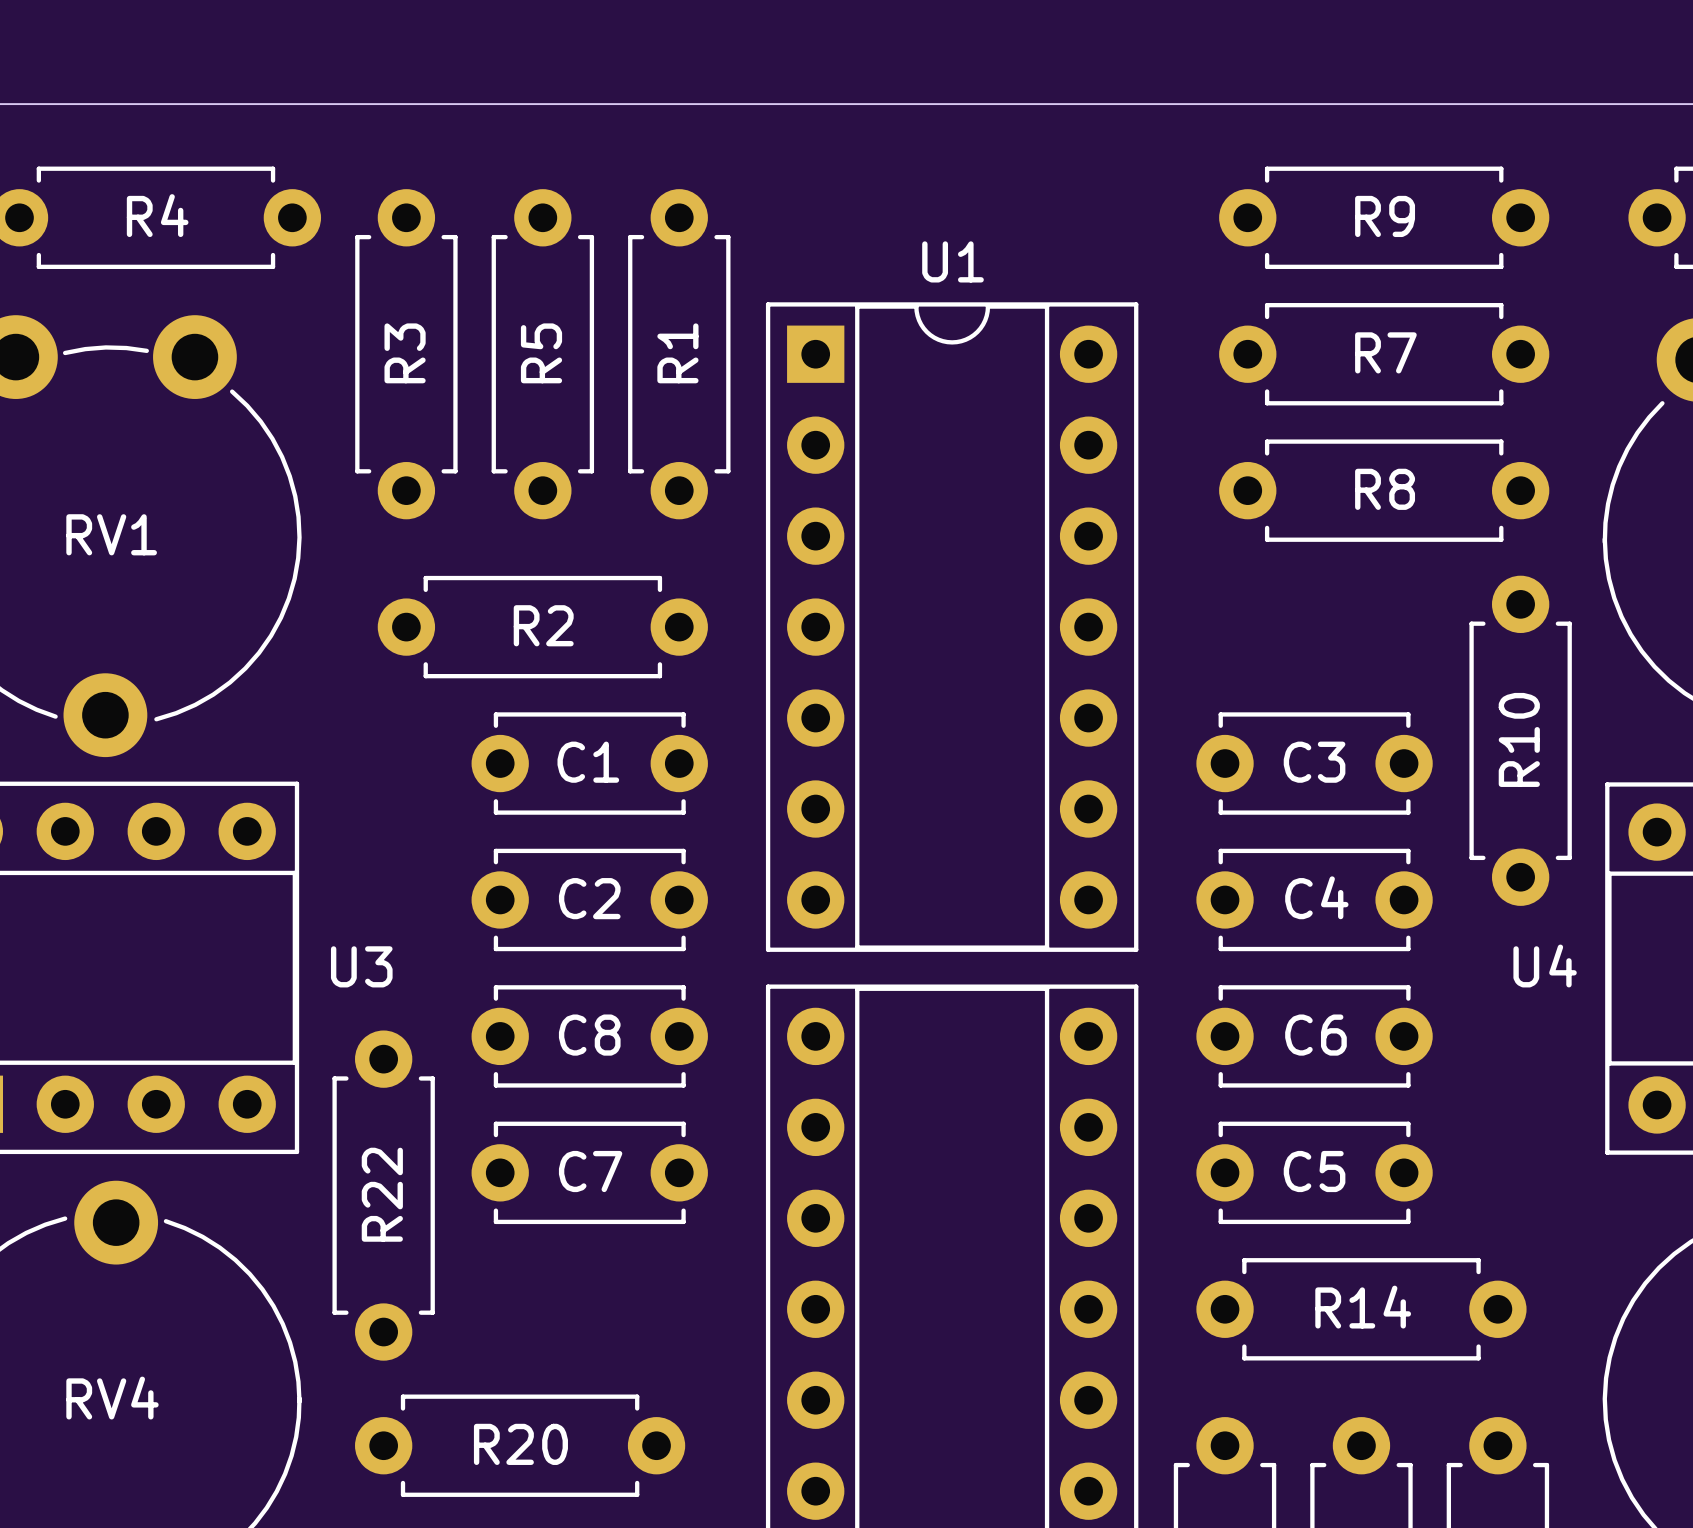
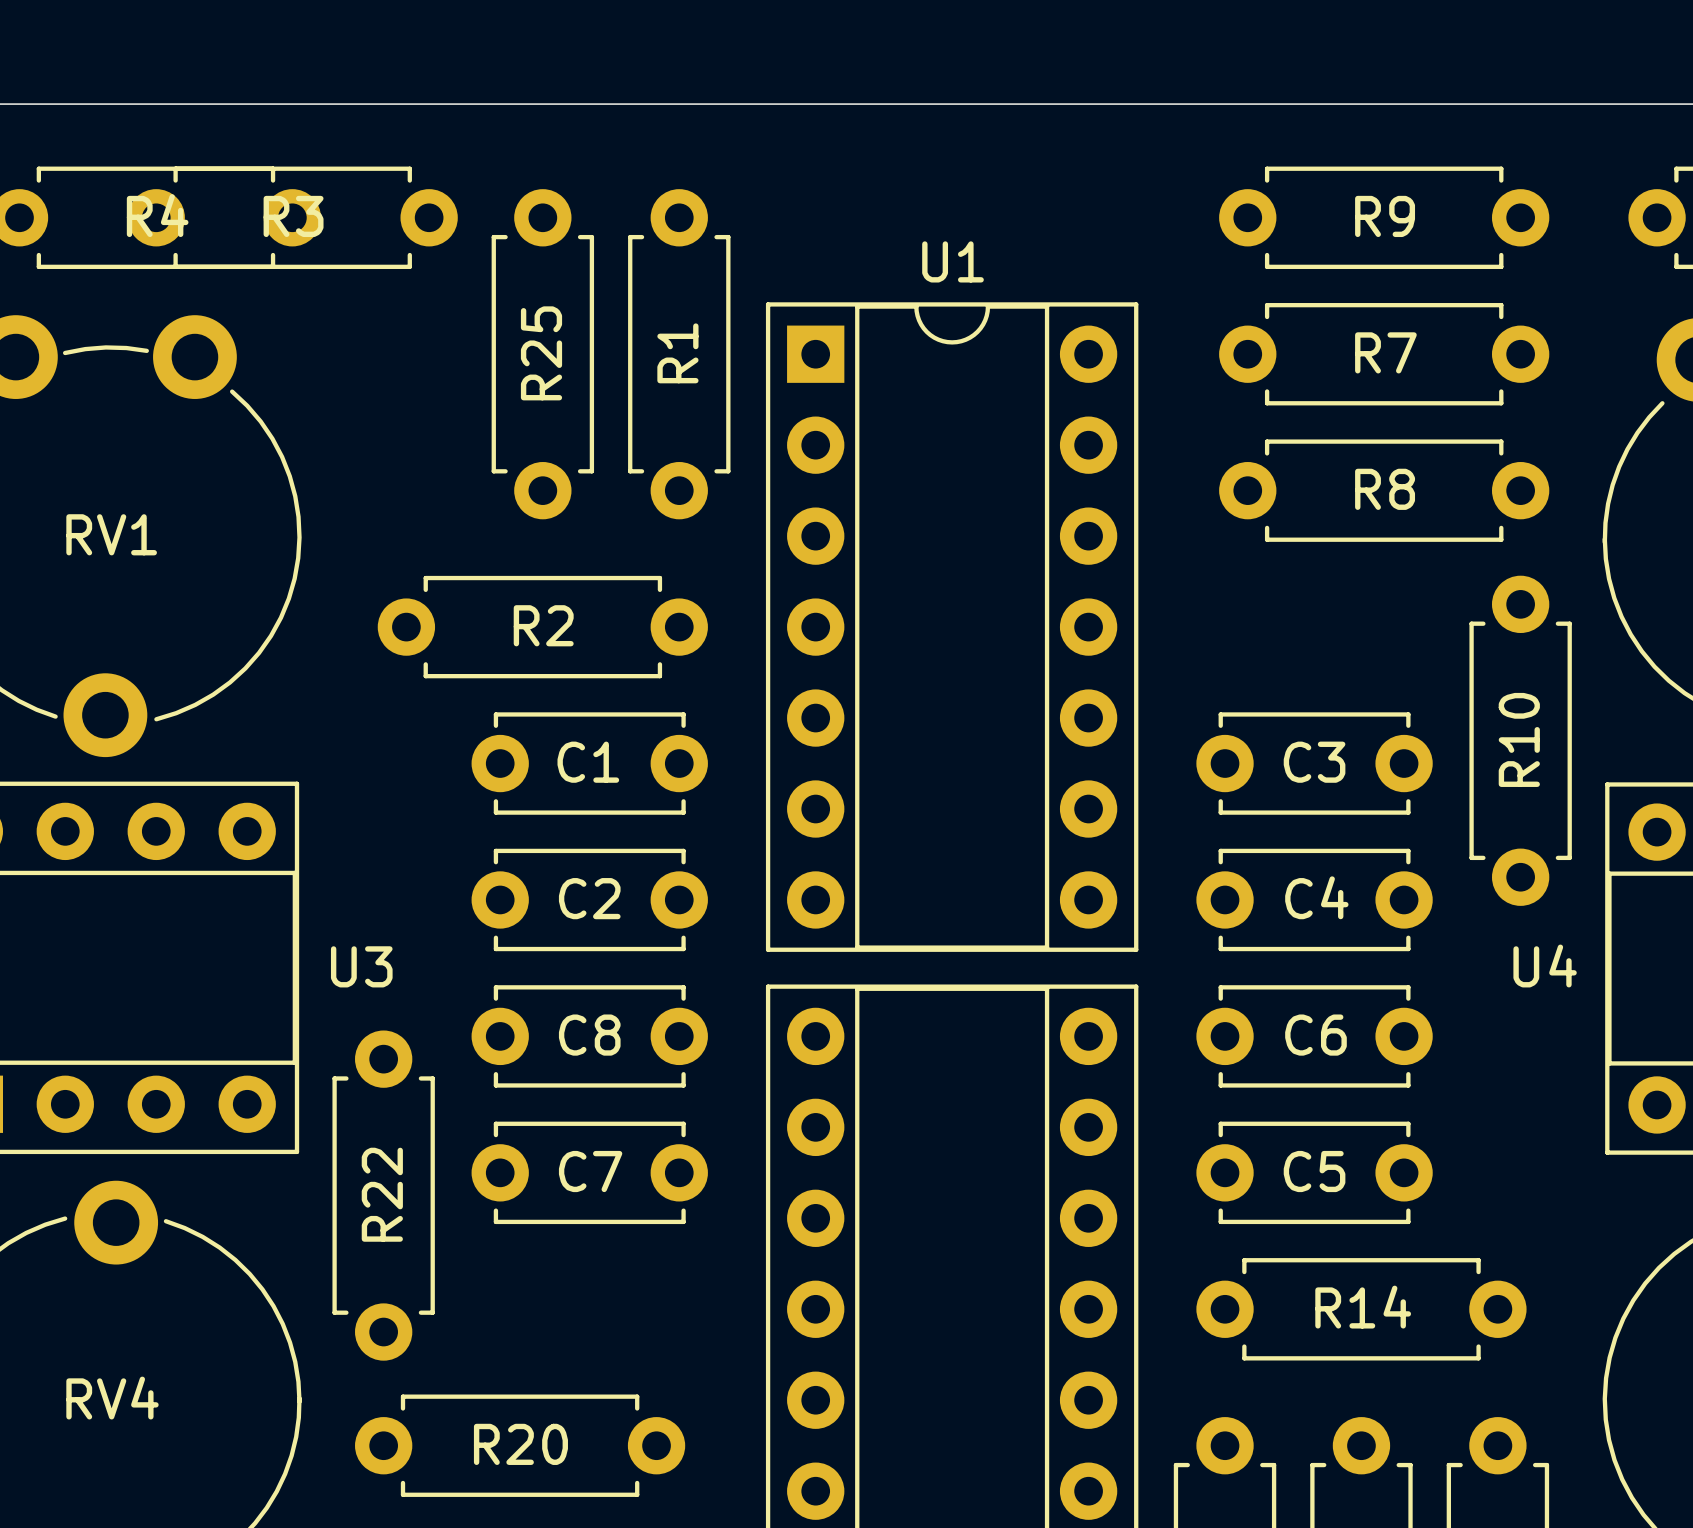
R5 name: R5 (541, 353) -> R25 (541, 353)
R3 rotation: 0° (406, 354) -> 90° clockwise (292, 217)

